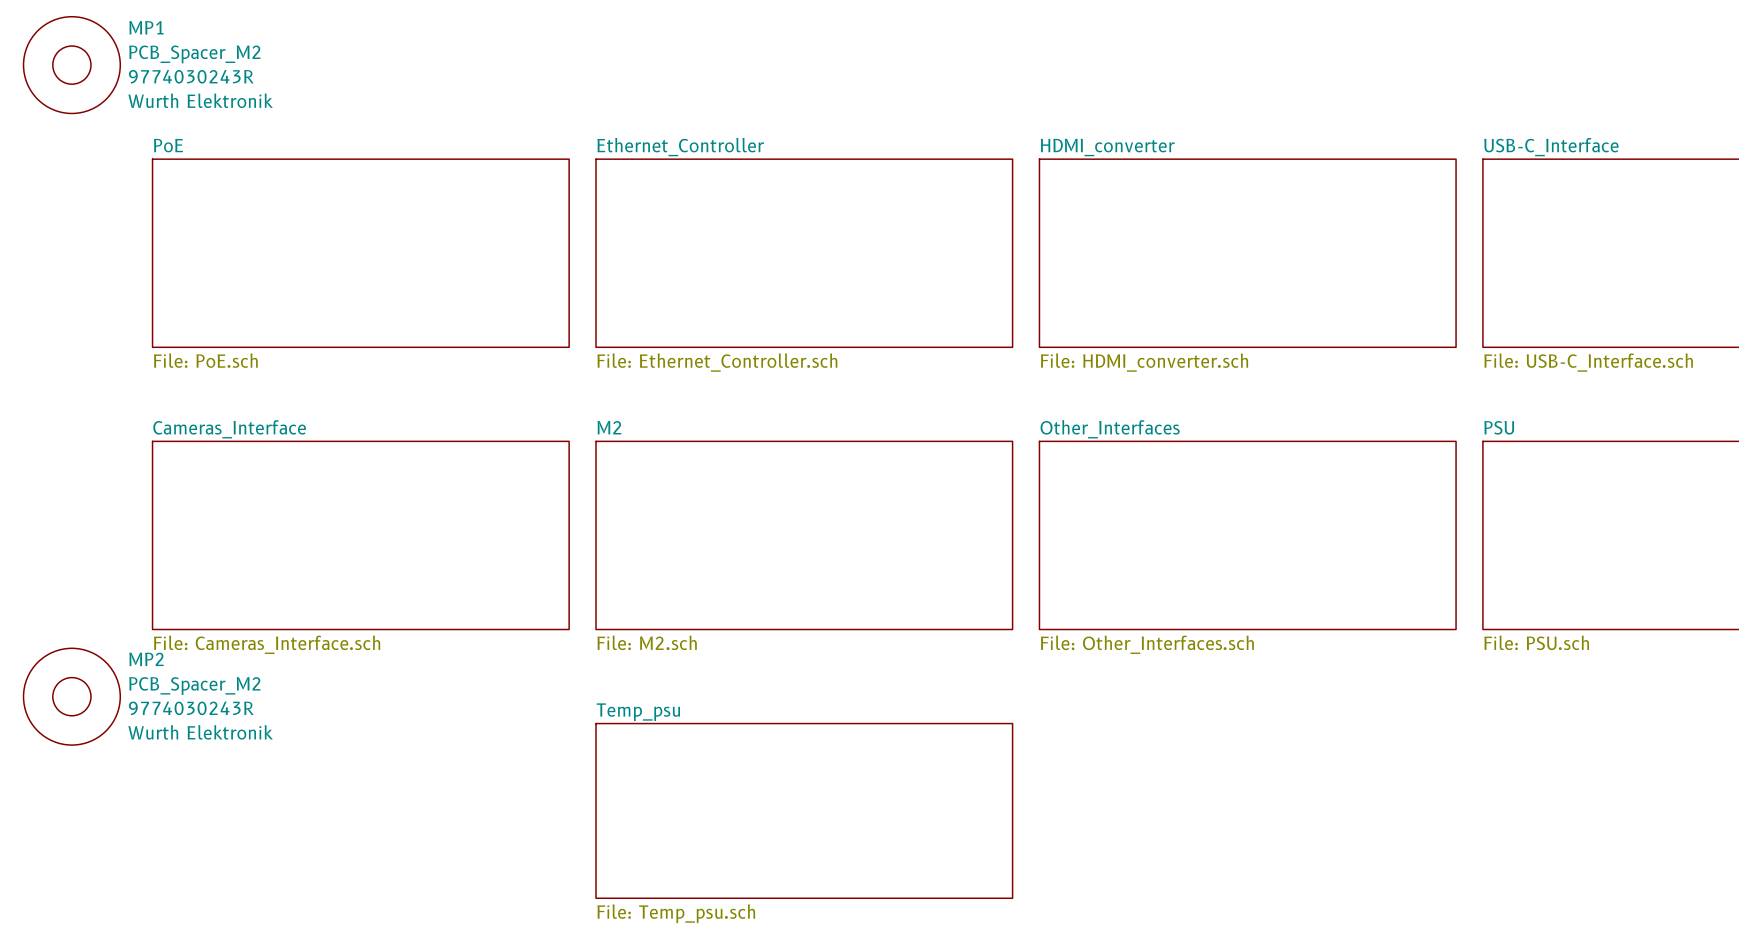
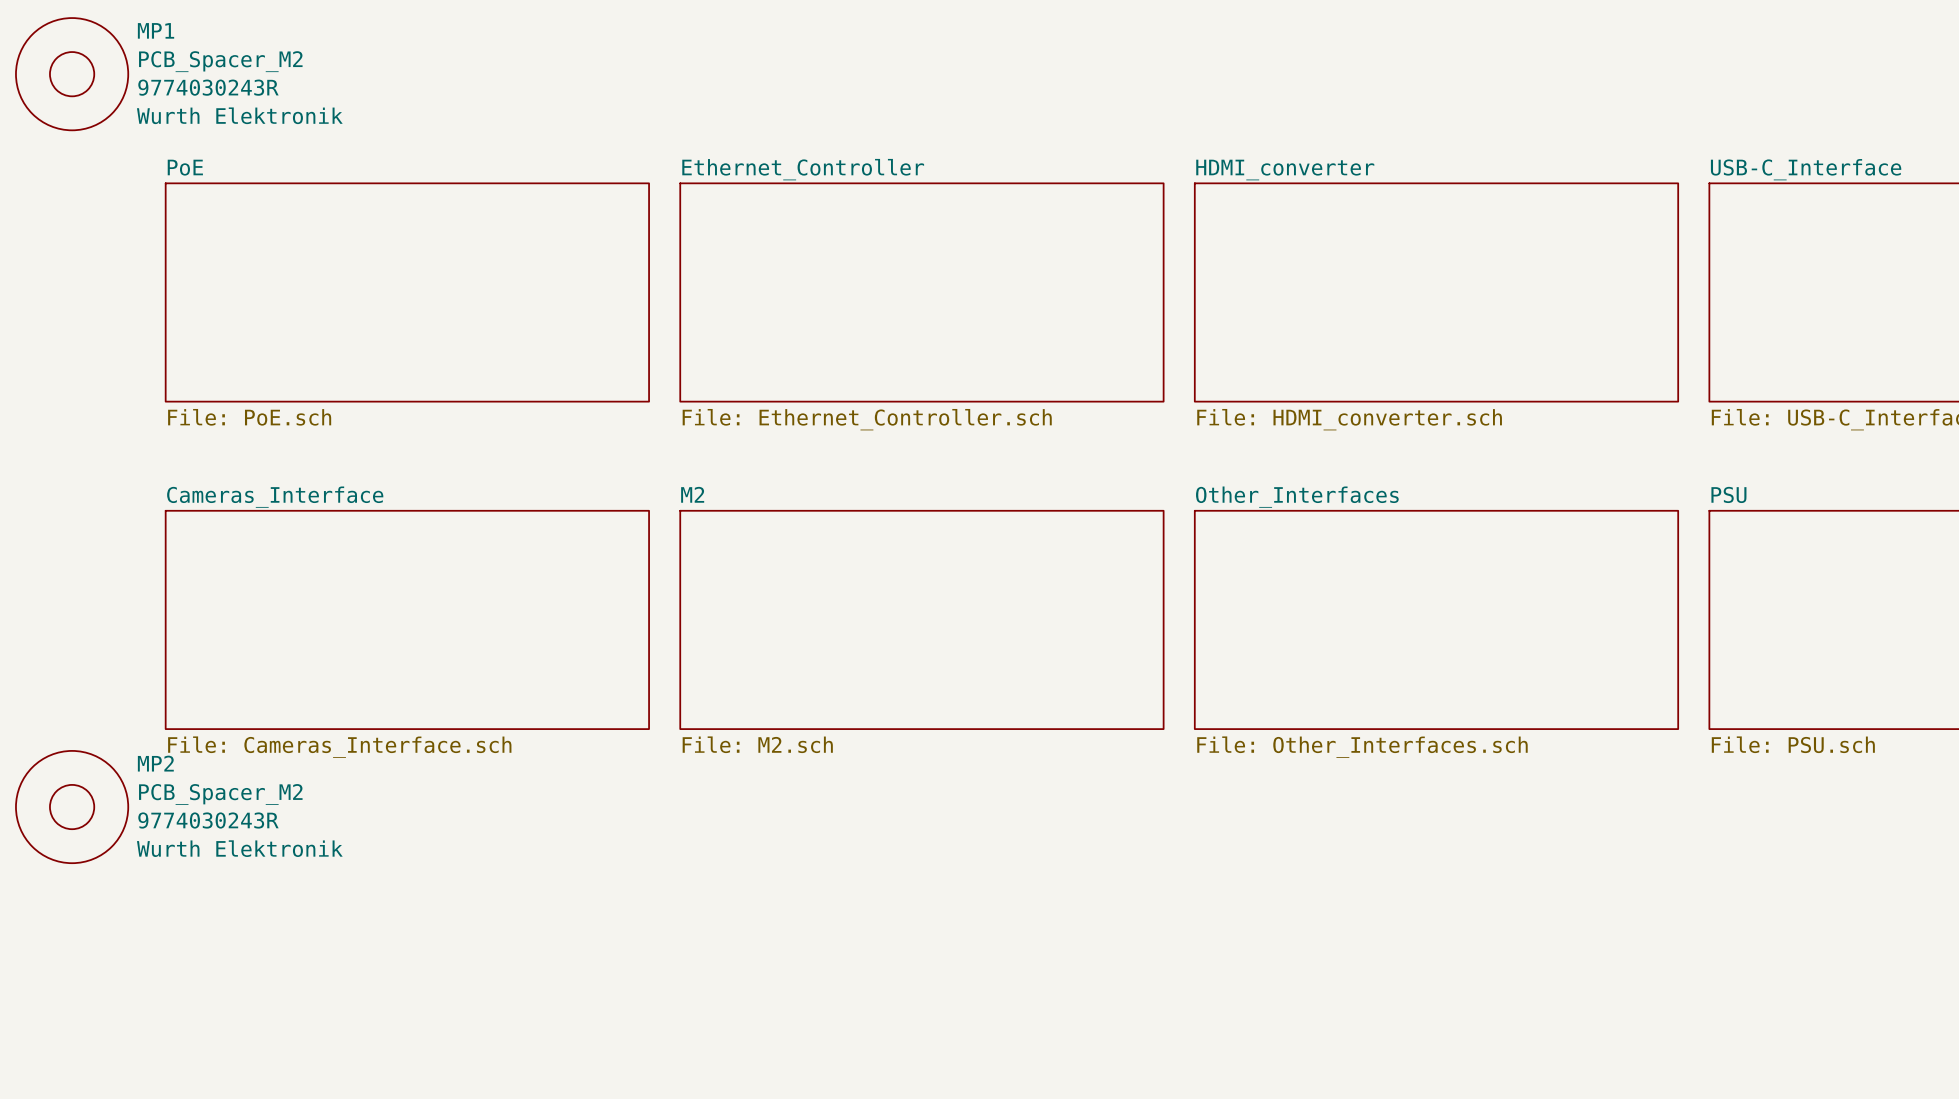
sheet Temp_psu: File: Temp_psu.sch (804, 810) -> none

